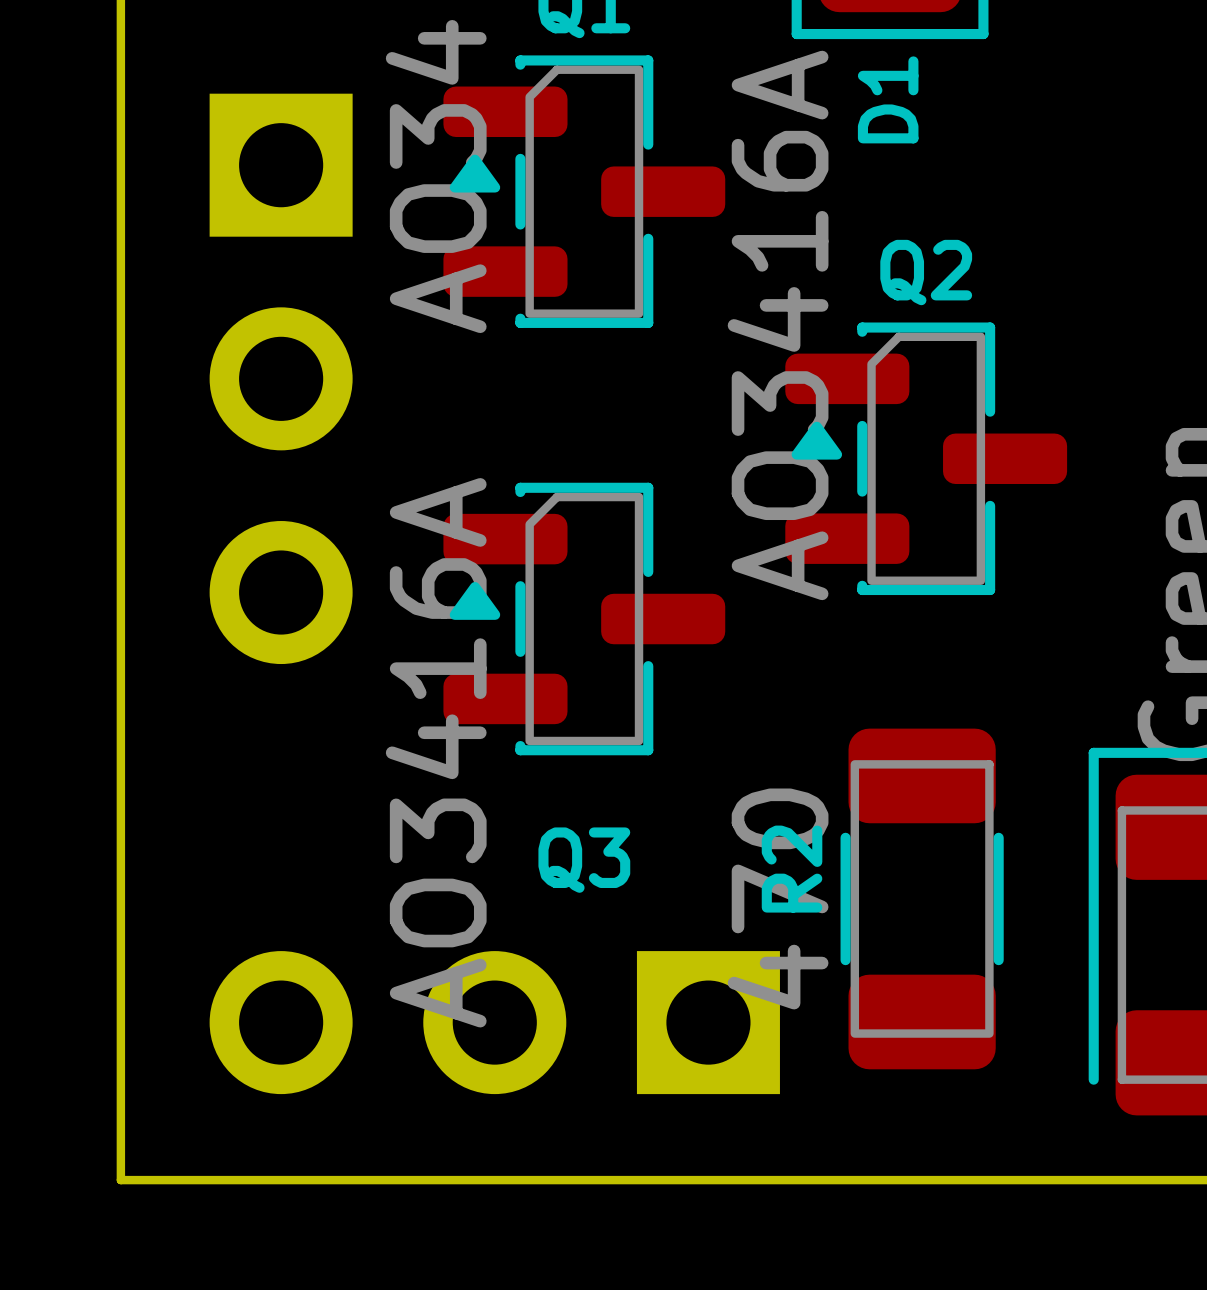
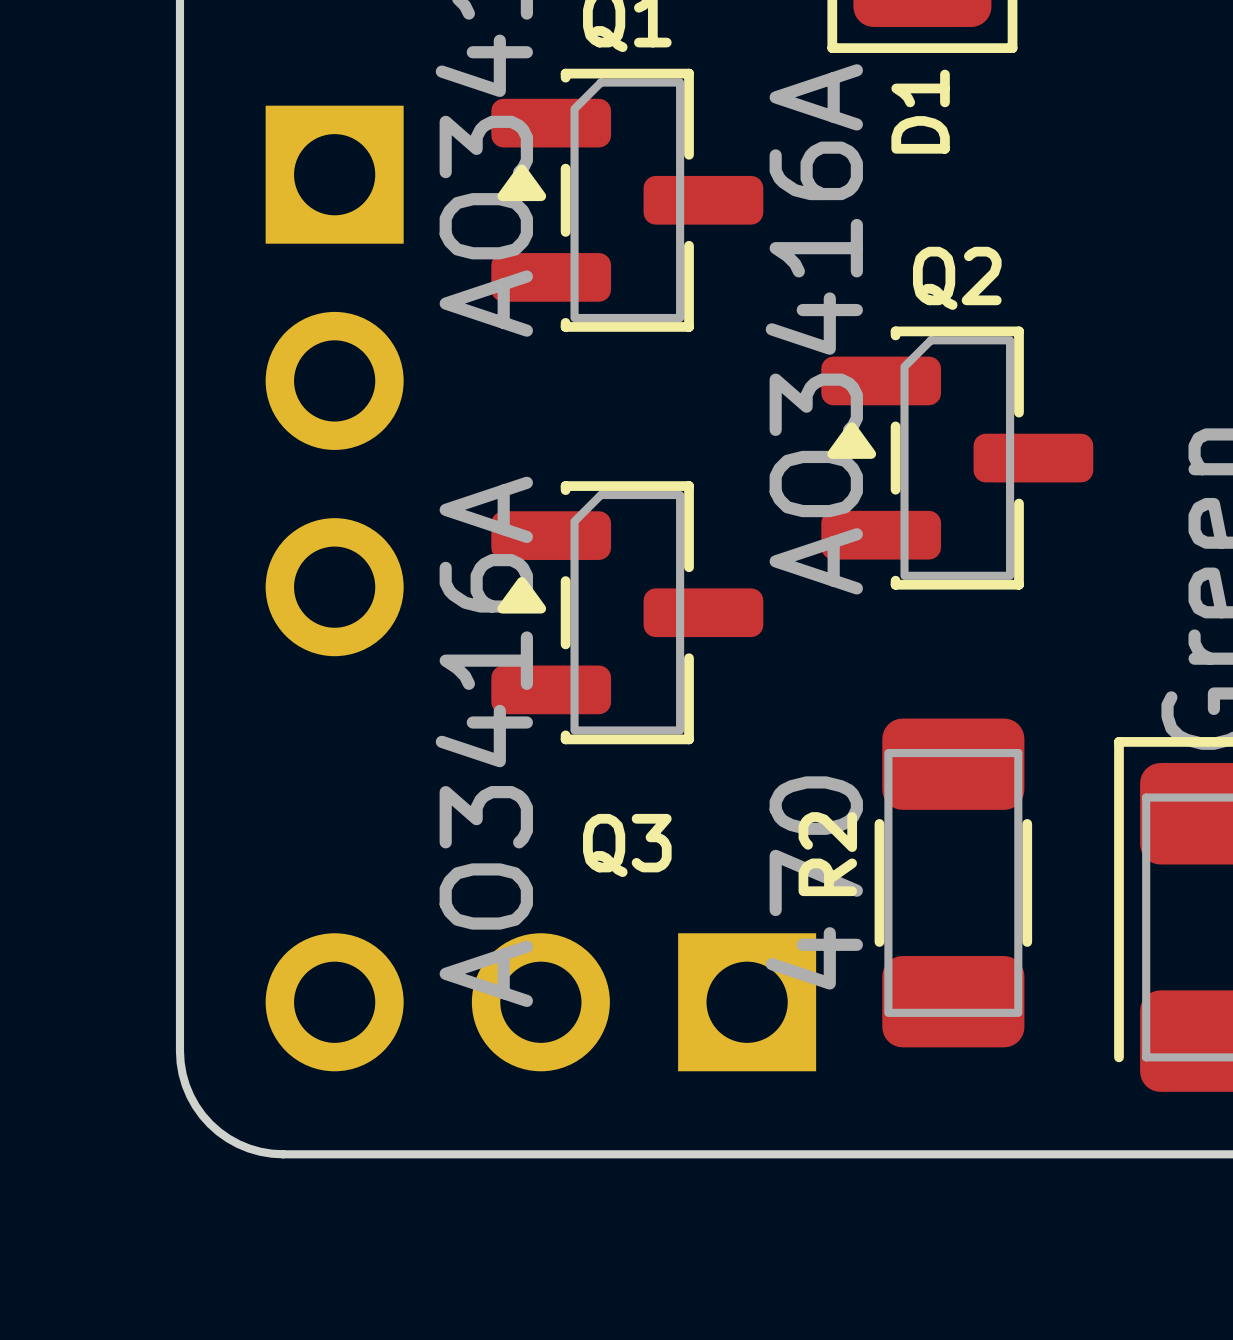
board edge: (120, 1073) (120, 1180) (227, 1180) -> (179, 1051) (182, 1074) (190, 1095) (210, 1124) (228, 1138) (249, 1148) (283, 1154)

